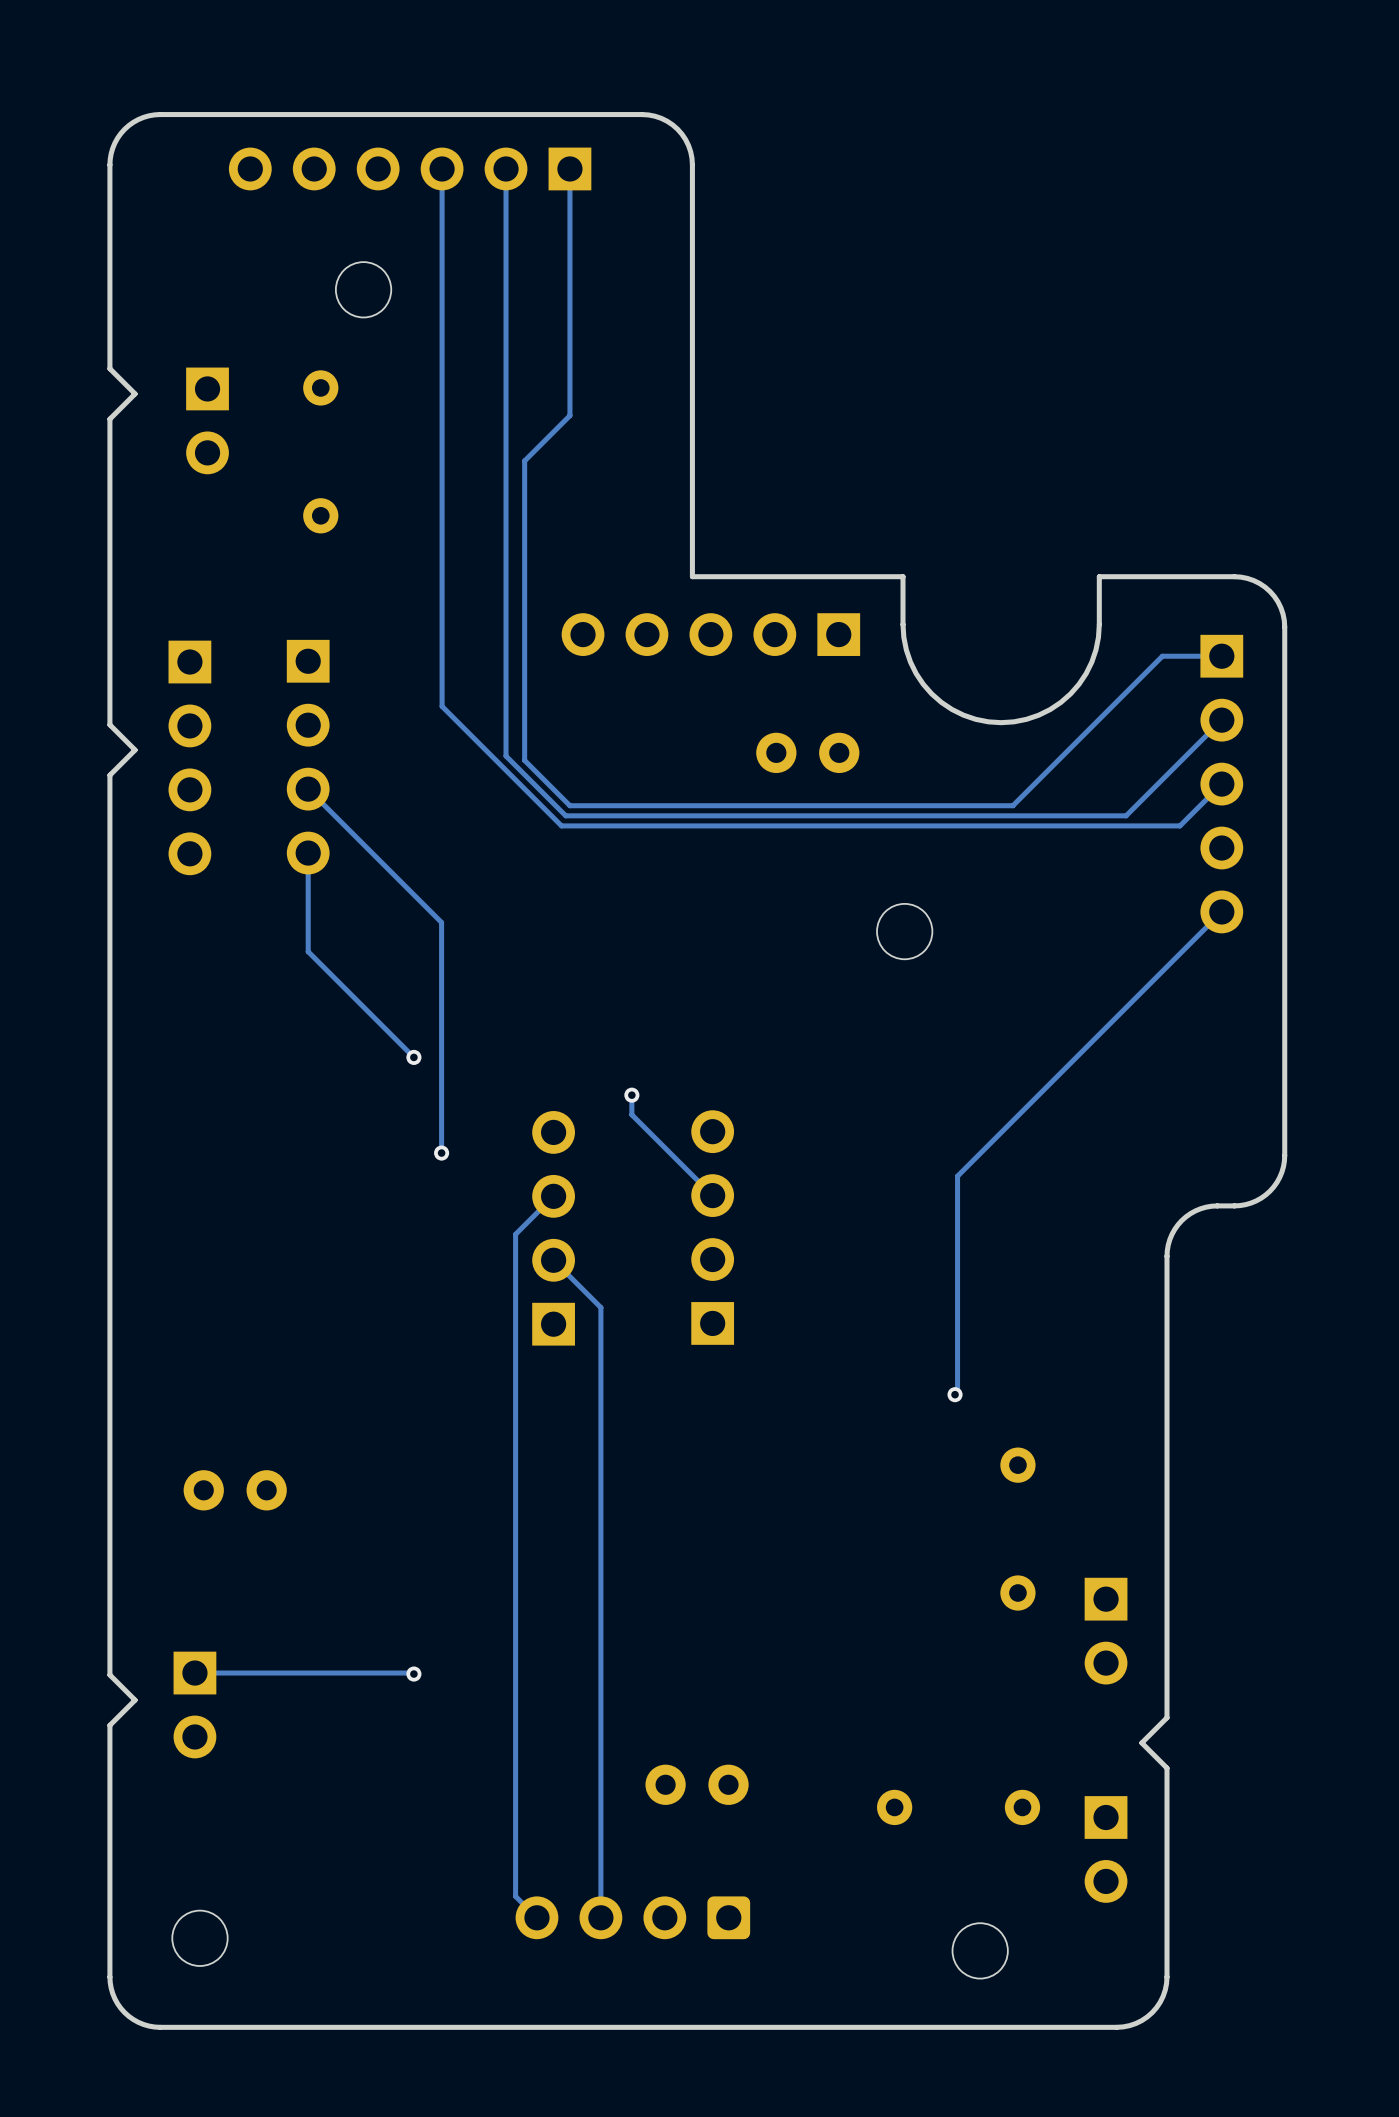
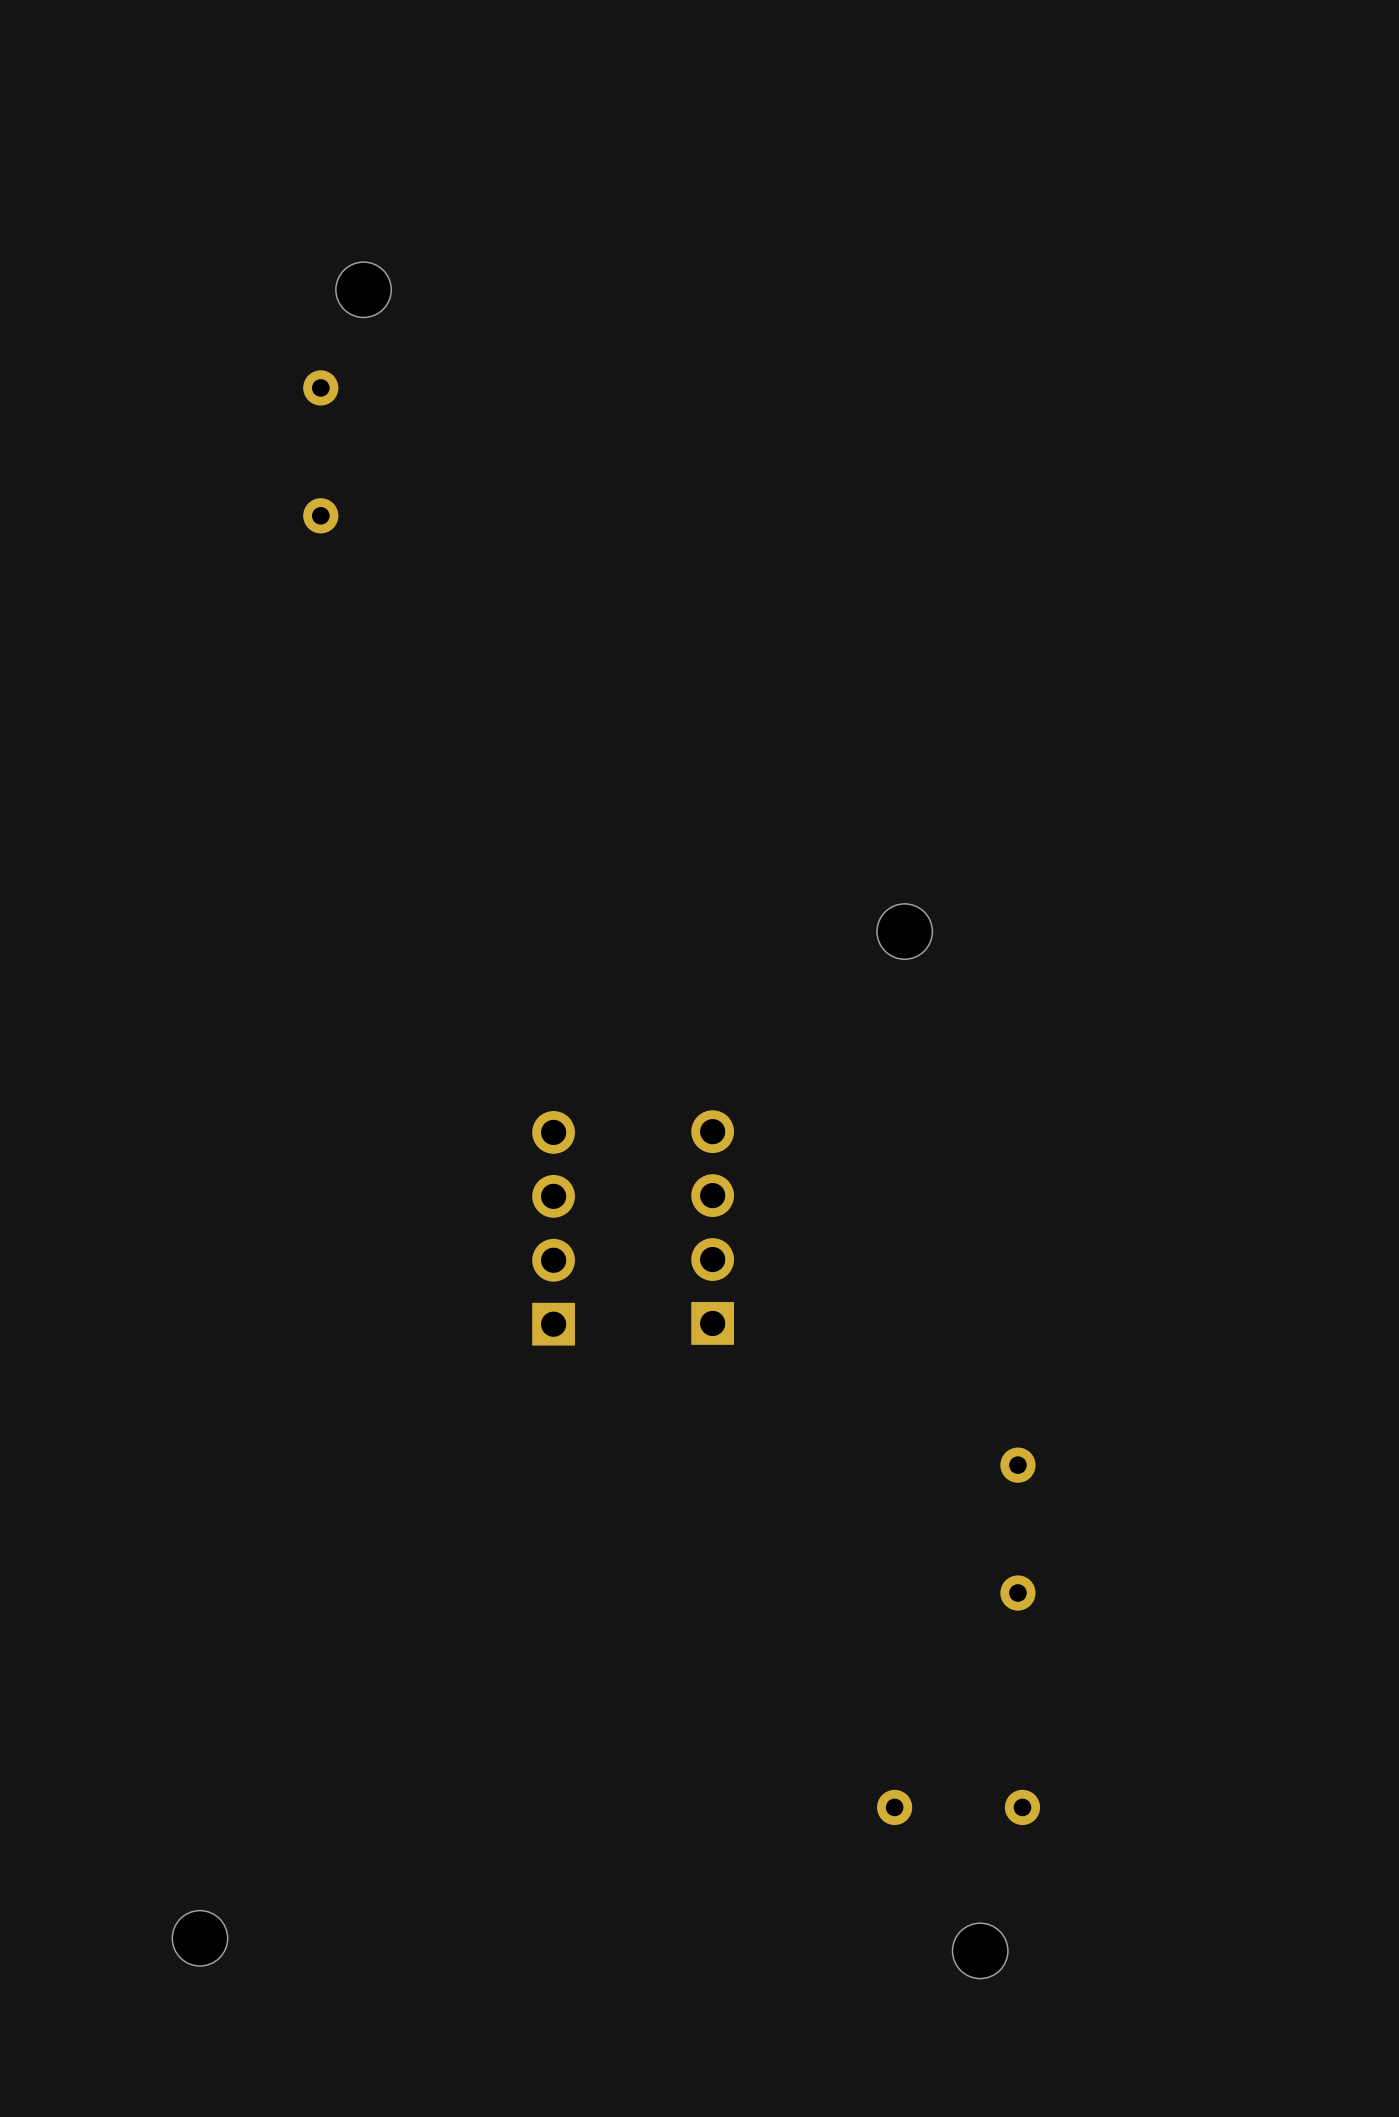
board edge: (642, 114) (154, 114) (138, 119) (124, 129) (114, 143) (111, 153) (109, 368) (135, 393) (109, 419) (109, 724) (135, 750) (109, 775) (109, 1674) (135, 1700) (109, 1725) (109, 1977) (112, 1993) (120, 2008) (133, 2019) (149, 2026) (1116, 2027) (1129, 2025) (1147, 2016) (1160, 2002) (1165, 1990) (1166, 1977) (1166, 1768) (1141, 1742) (1166, 1717) (1167, 1250) (1171, 1234) (1185, 1216) (1206, 1207) (1240, 1205) (1256, 1200) (1273, 1186) (1283, 1166) (1284, 627) (1283, 614) (1277, 601) (1269, 591) (1259, 583) (1247, 578) (1234, 576) (1099, 576) (1098, 637) (1091, 662) (1079, 684) (1070, 693) (1050, 709) (1026, 719) (1001, 722) (988, 721) (963, 715) (941, 702) (923, 684) (910, 662) (903, 637) (903, 576) (692, 576) (691, 158) (685, 139) (677, 129) (661, 118) (642, 114) -> none
part: (410, 168) -> none
track: (442, 168) (442, 706) (561, 825) (1179, 825) (1221, 784) -> none
track: (506, 168) (506, 756) (565, 815) (1126, 815) (1221, 720) -> none
track: (569, 168) (569, 415) (524, 460) (524, 760) (569, 805) (1012, 805) (1162, 656) (1221, 656) -> none
part: (207, 420) -> none
part: (710, 634) -> none
part: (807, 752) -> none
part: (189, 757) -> none
part: (308, 757) -> none
part: (1221, 784) -> none
track: (308, 789) (441, 922) (441, 1153) -> none
track: (308, 853) (308, 951) (413, 1057) -> none
track: (1221, 911) (957, 1176) (957, 1392) (955, 1394) -> none
via: (413, 1057) -> none
track: (631, 1095) (631, 1114) (712, 1195) -> none
via: (631, 1095) -> none
via: (441, 1153) -> none
track: (553, 1196) (515, 1234) (515, 1896) (536, 1917) -> none
track: (553, 1260) (600, 1307) (600, 1917) -> none
via: (955, 1394) -> none
part: (235, 1490) -> none
part: (1106, 1631) -> none
track: (194, 1673) (413, 1674) -> none
via: (413, 1674) -> none
part: (194, 1705) -> none
part: (697, 1784) -> none
part: (1106, 1849) -> none
part: (632, 1917) -> none

